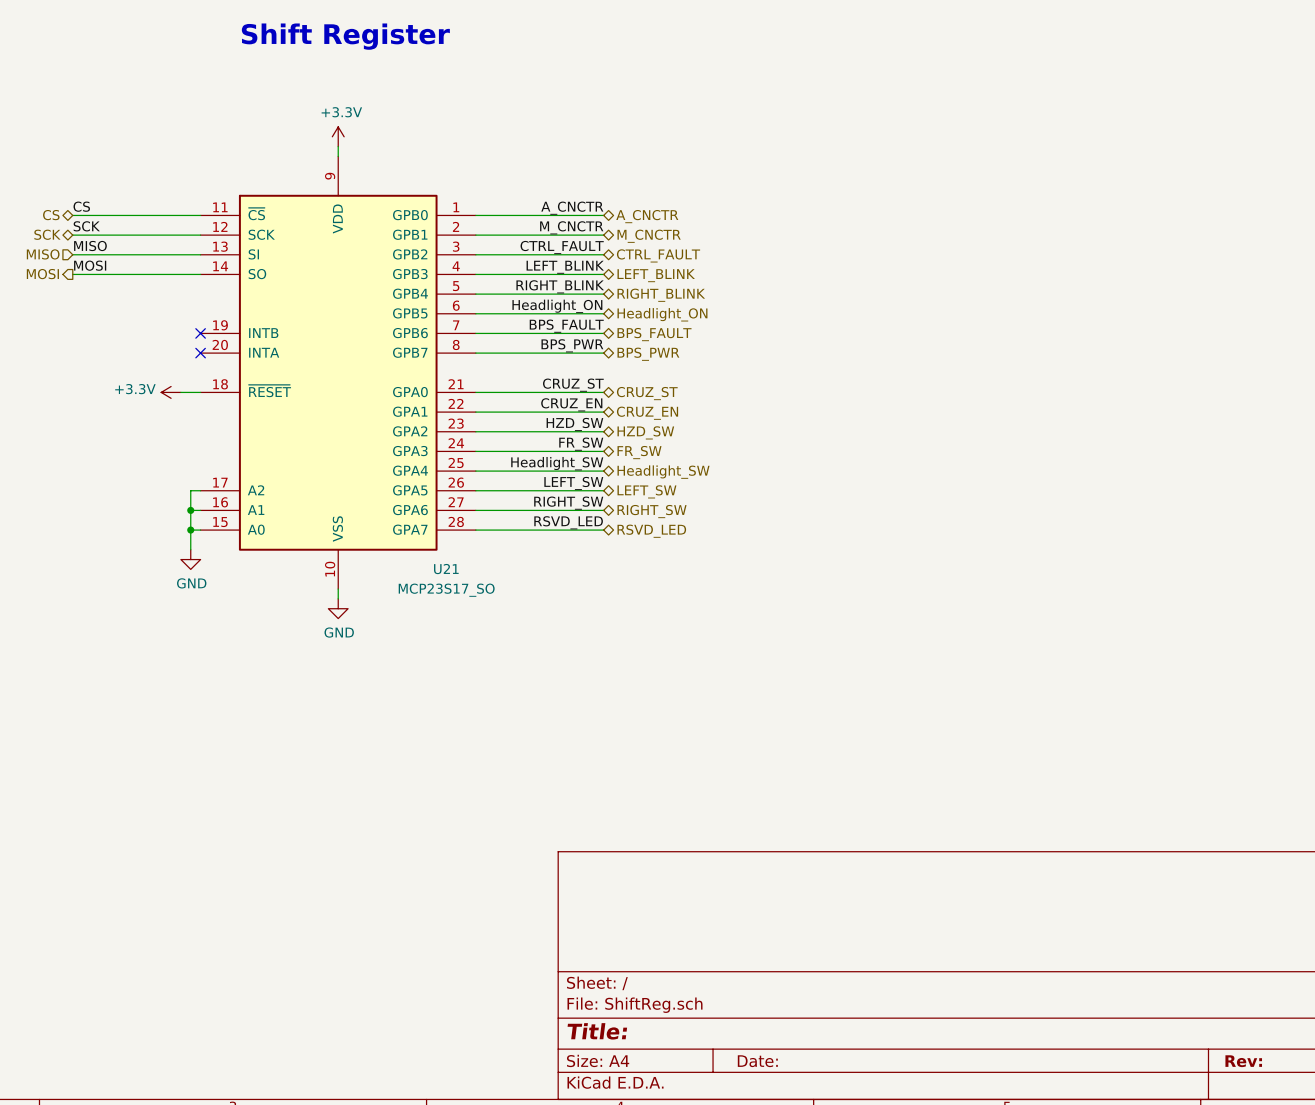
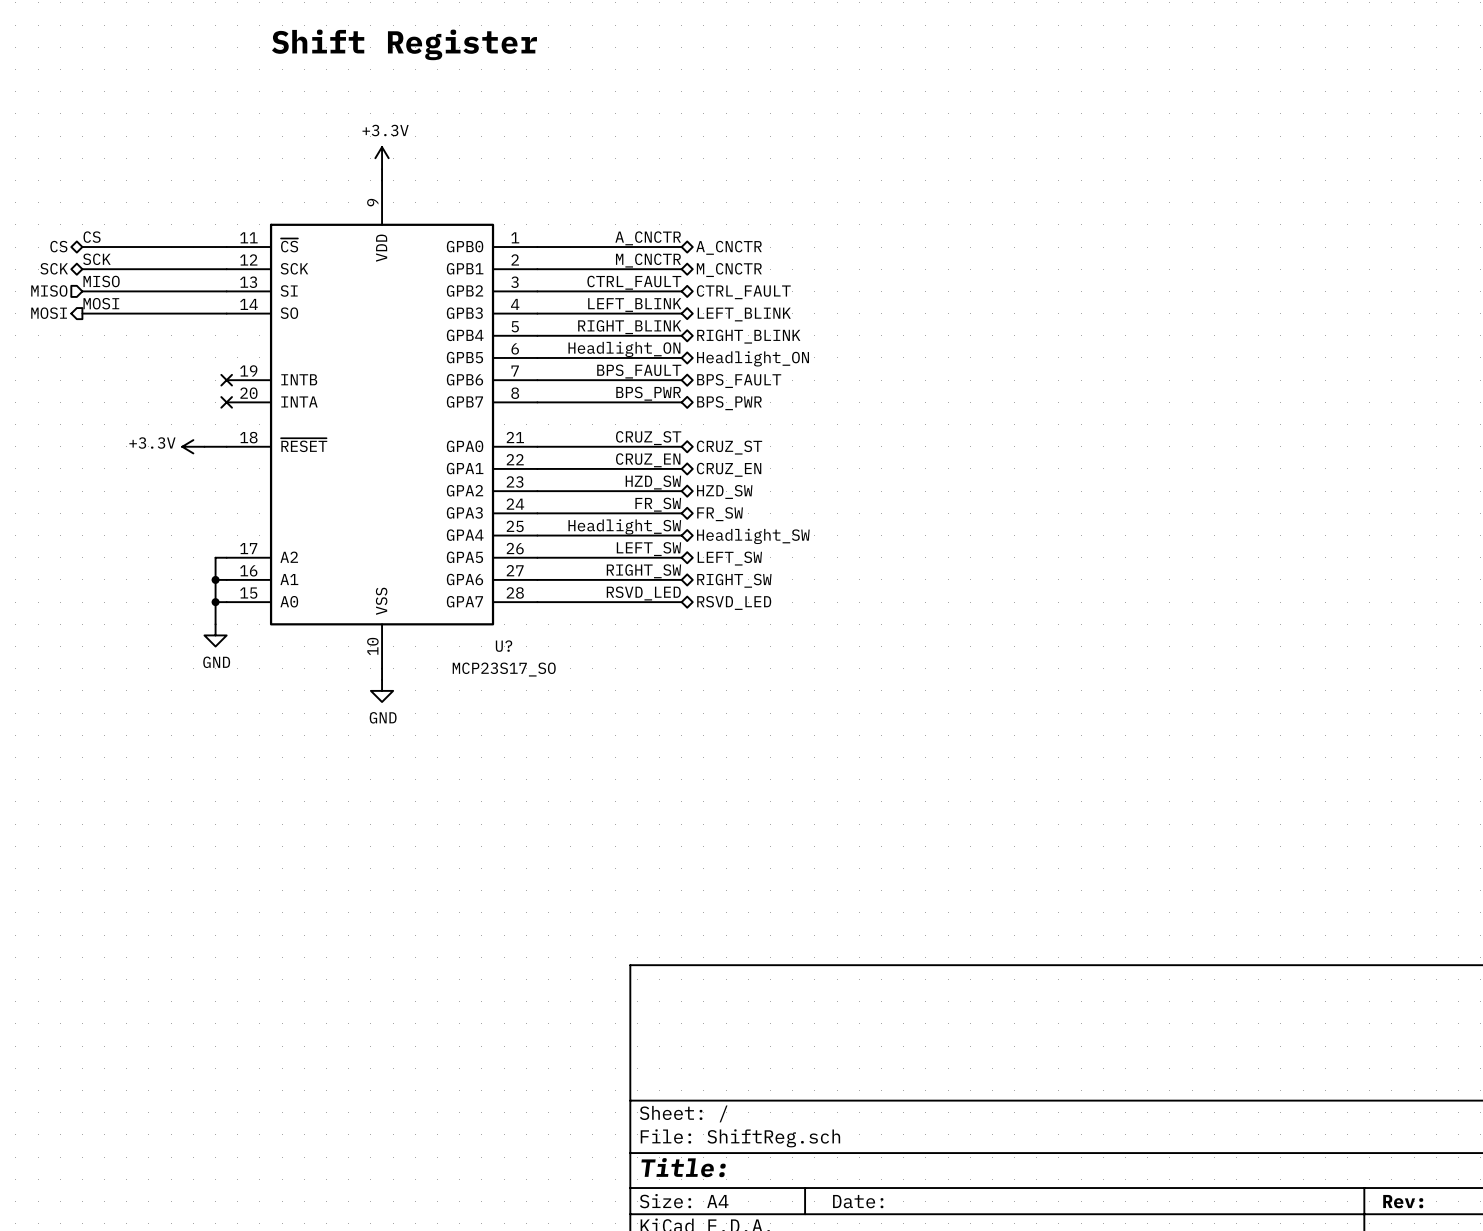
U21 name: U21 (446, 569) -> U? (504, 646)

